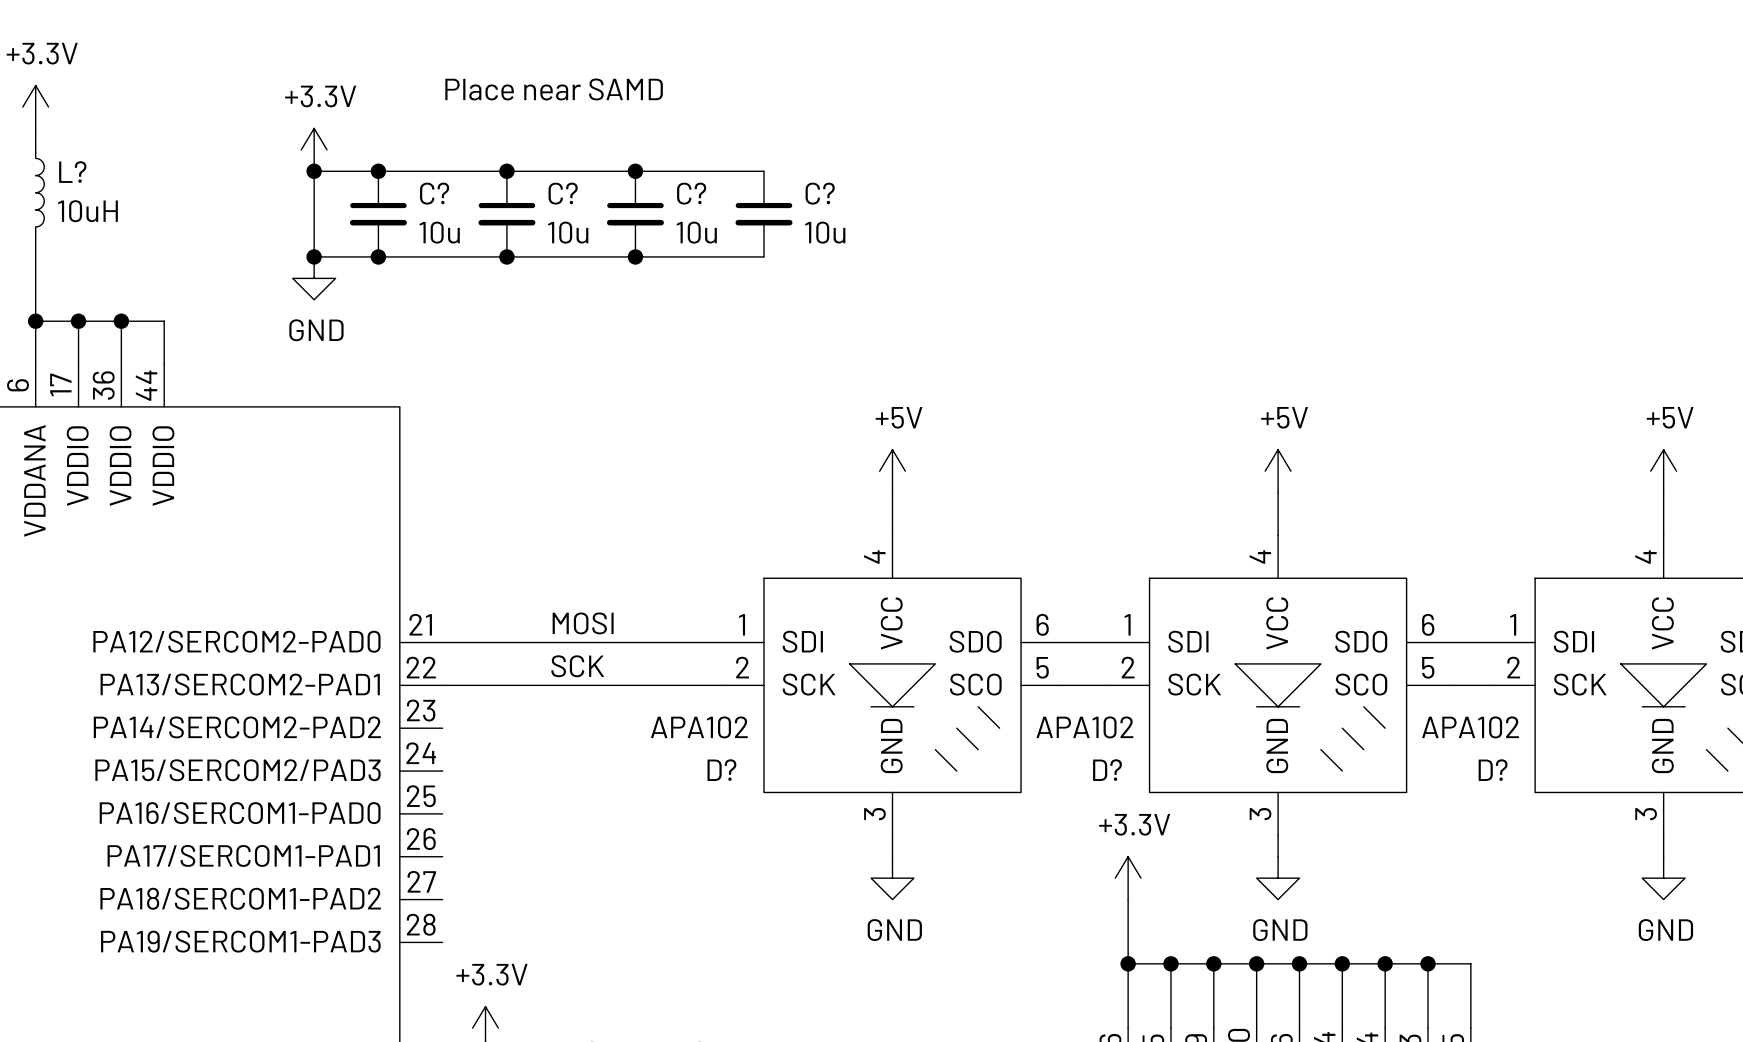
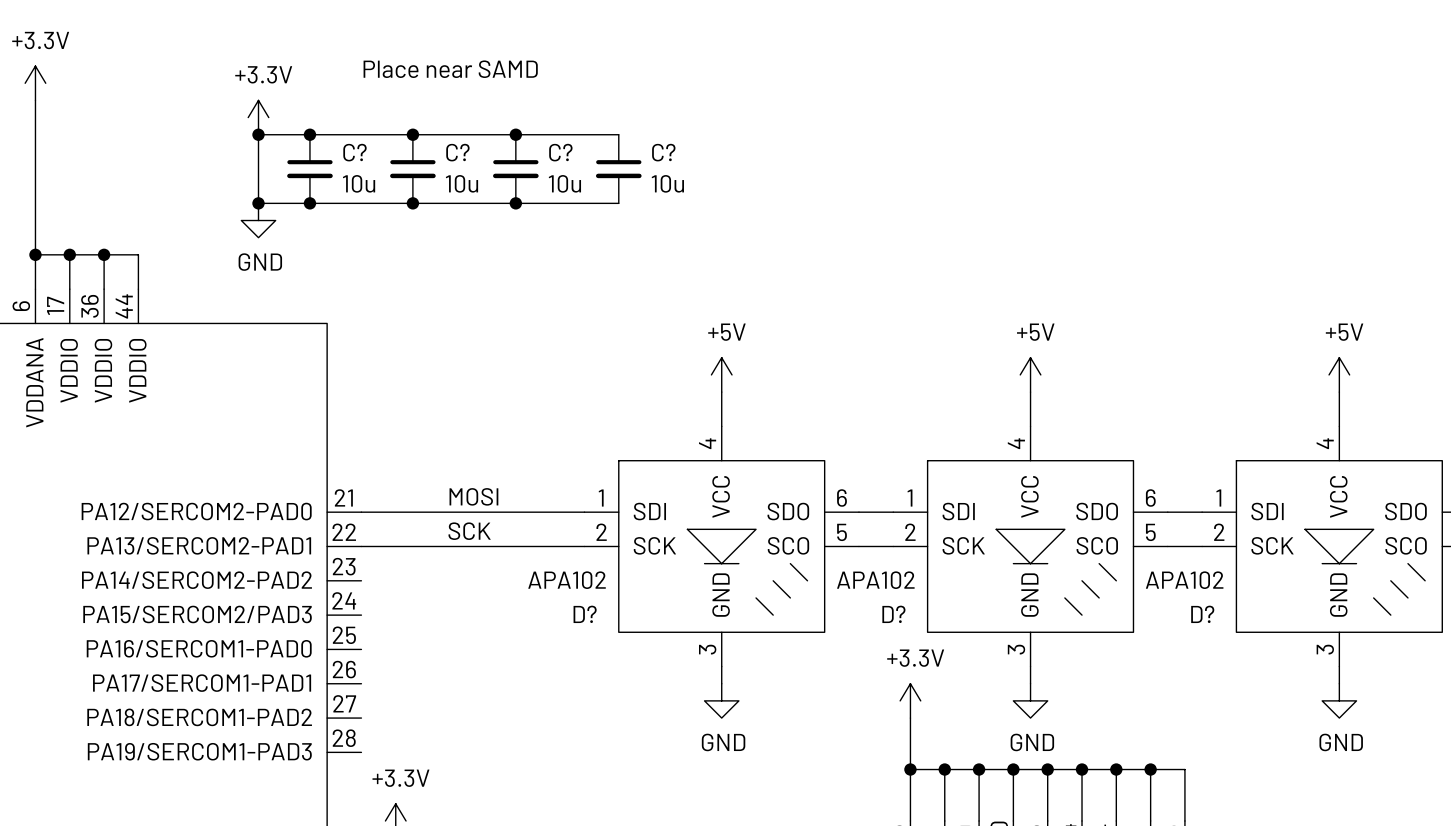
wire: none -> (35, 117) (35, 186)
L?: 10uH (39, 192) -> none

